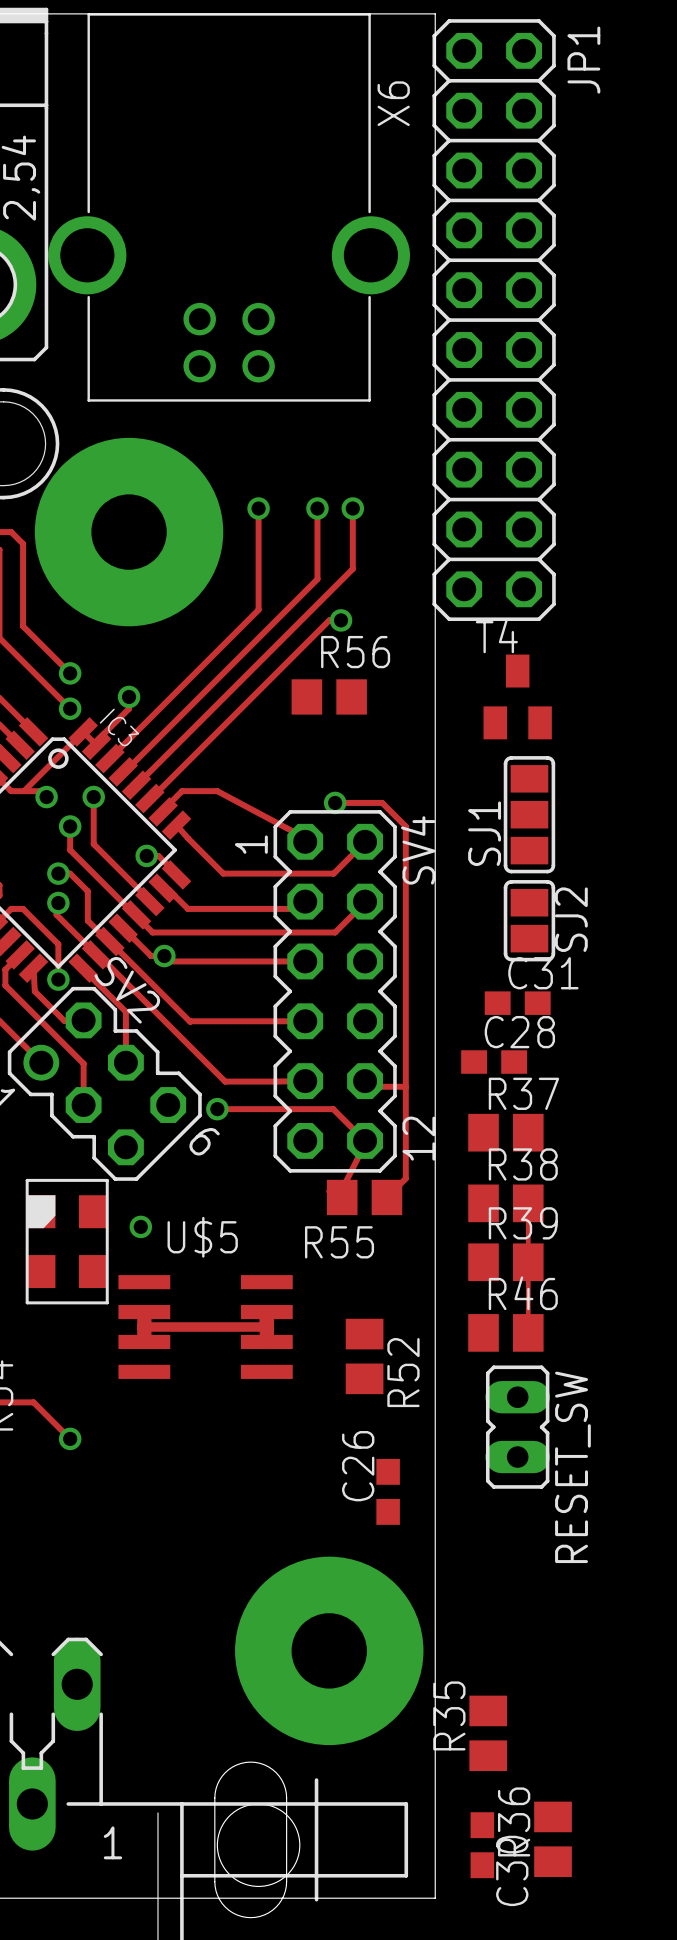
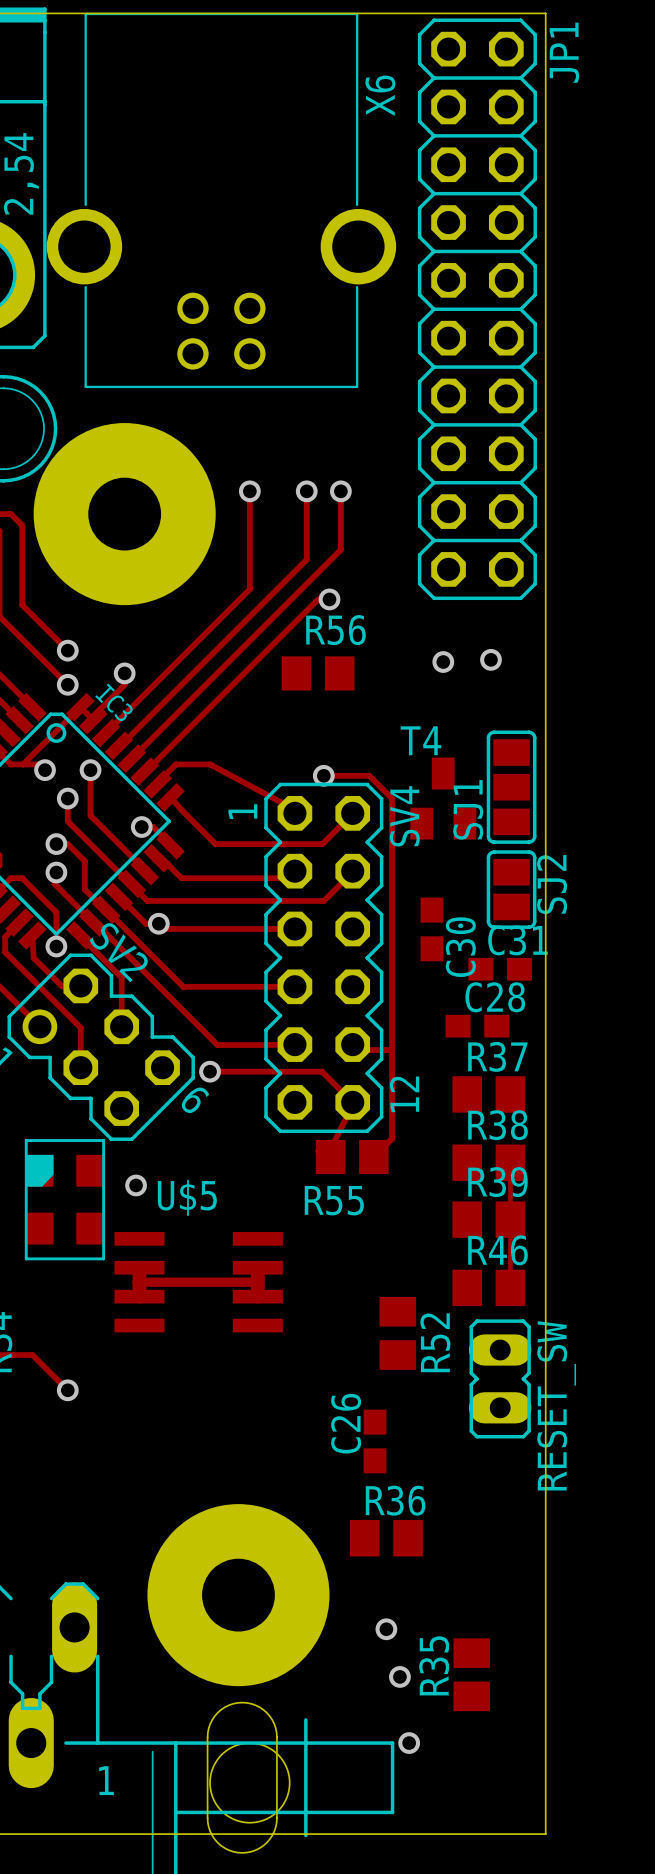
board edge: (435, 13) (435, 1898) -> (420, 13) (545, 13) (545, 1834) (420, 1834)
via: none -> (490, 659)
via: none -> (443, 662)
T4 position: (517, 696) -> (443, 798)
R52 position: (364, 1356) -> (397, 1333)
part position: (329, 1650) -> (238, 1595)
via: none -> (386, 1629)
via: none -> (399, 1676)
via: none -> (409, 1743)
R36 rotation: 0° (553, 1839) -> 90° clockwise (386, 1538)
R36 position: (553, 1839) -> (386, 1538)
C30 position: (482, 1845) -> (431, 929)

